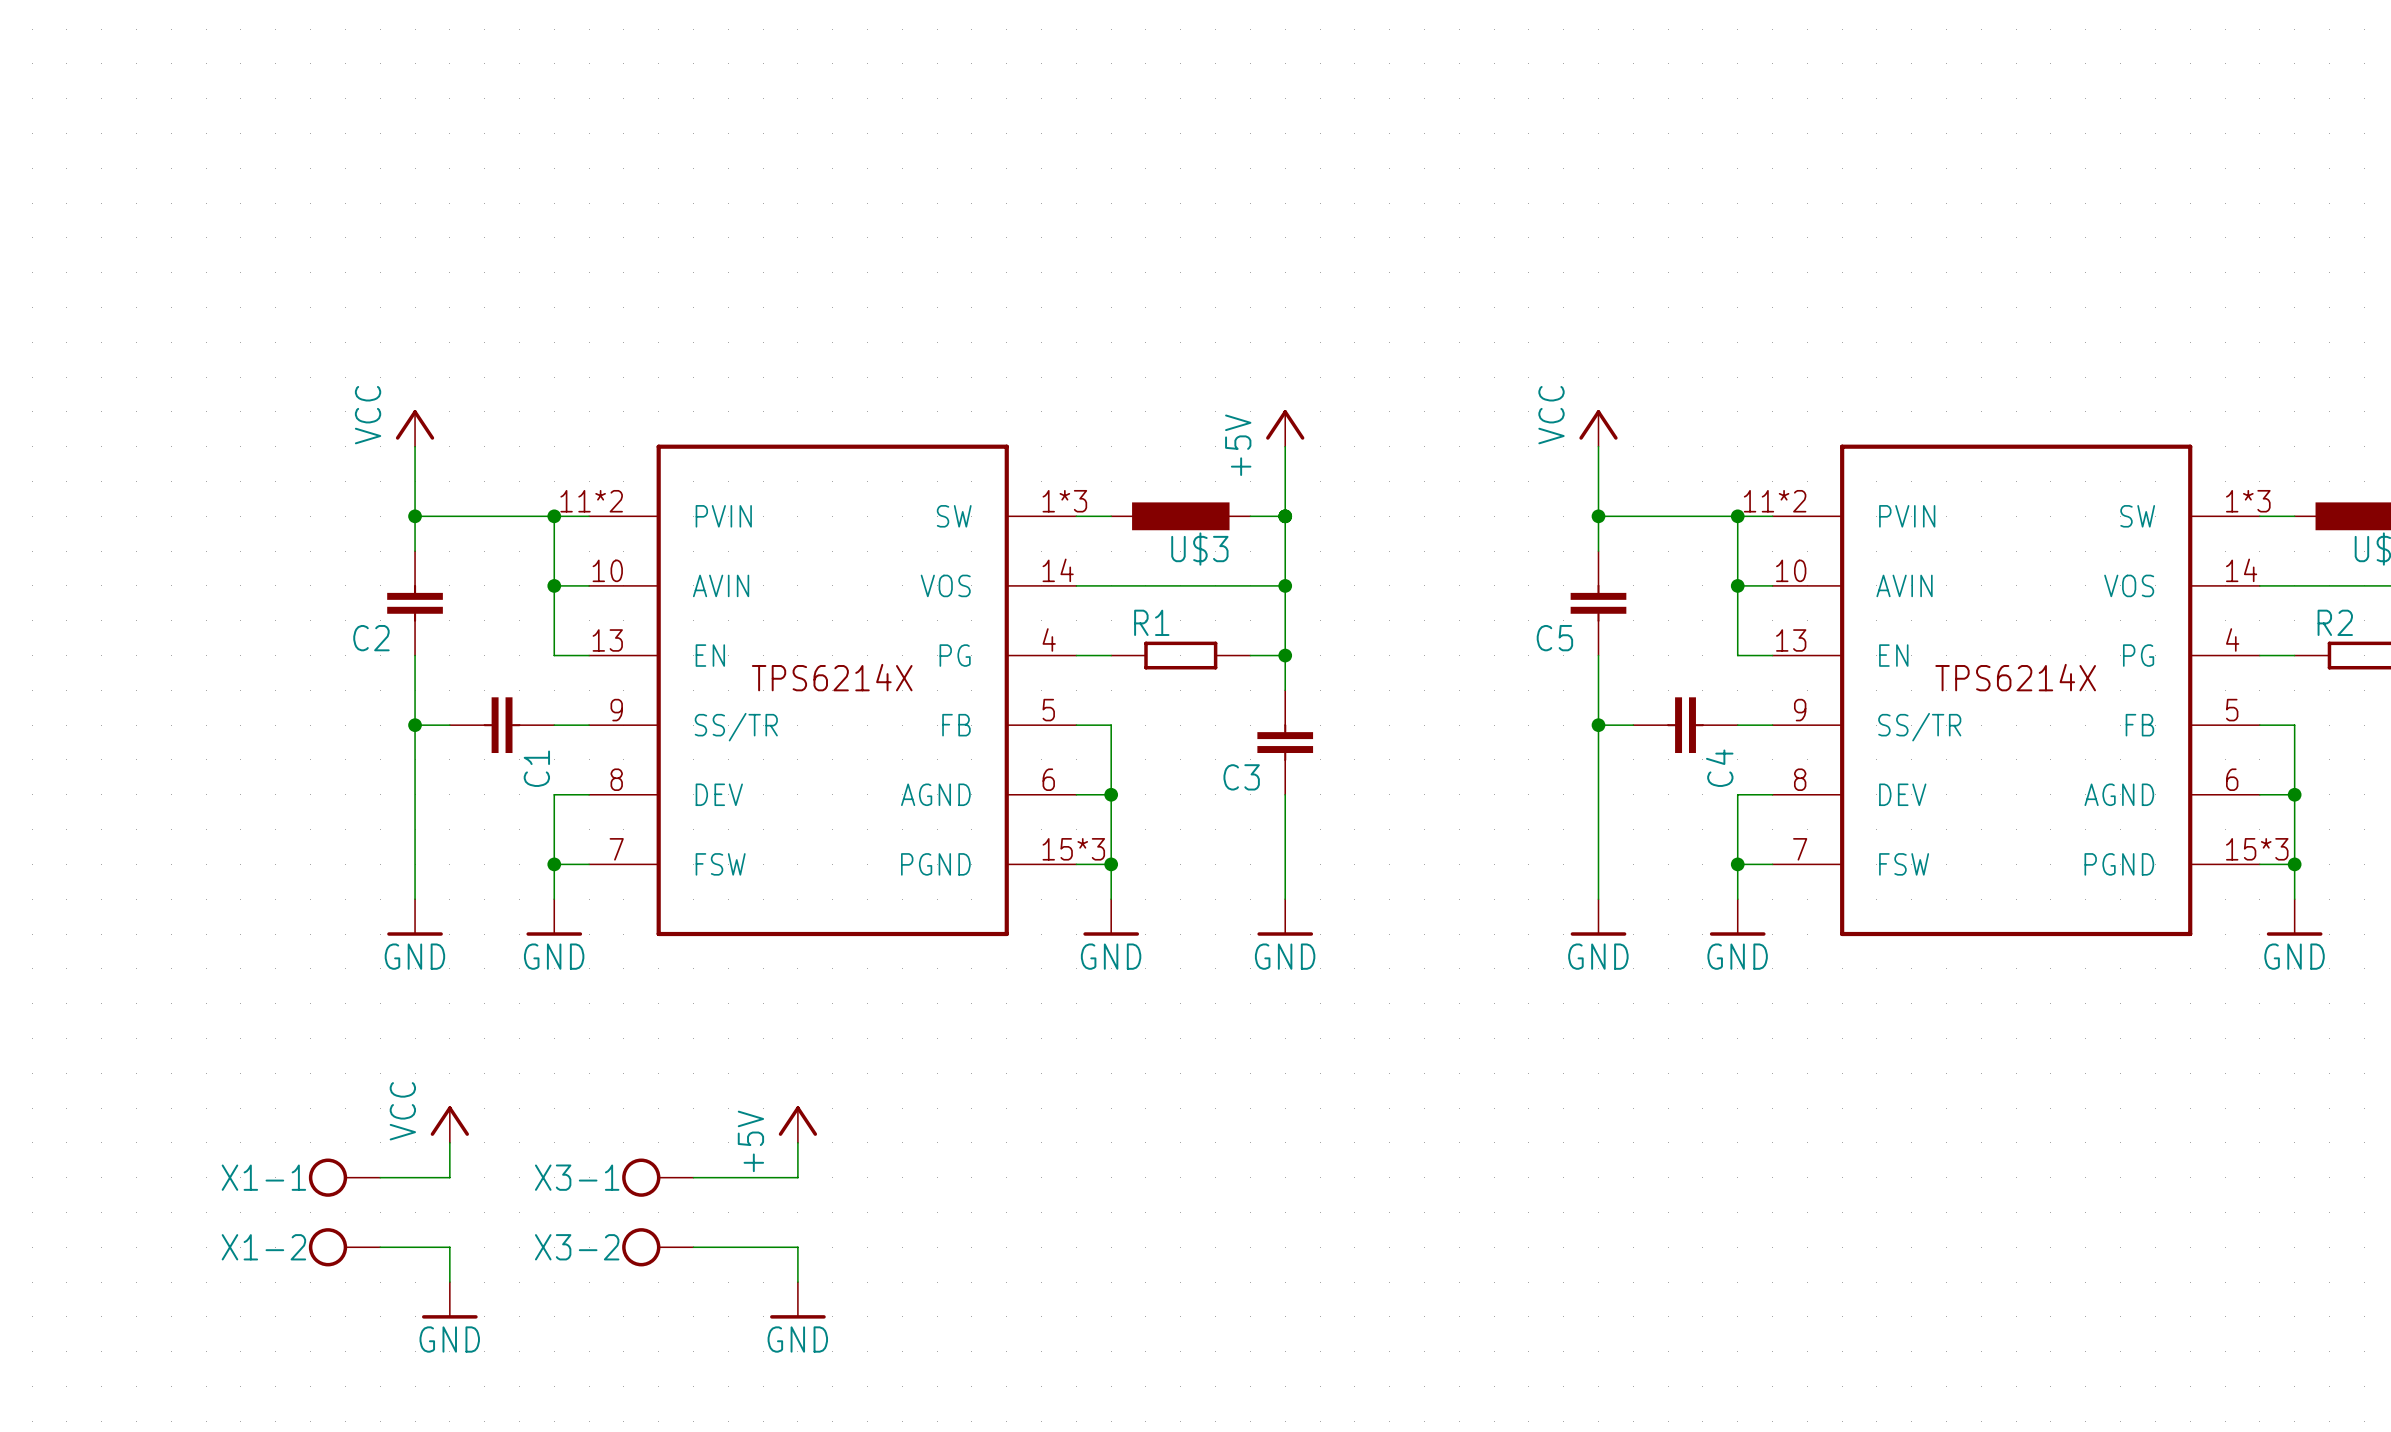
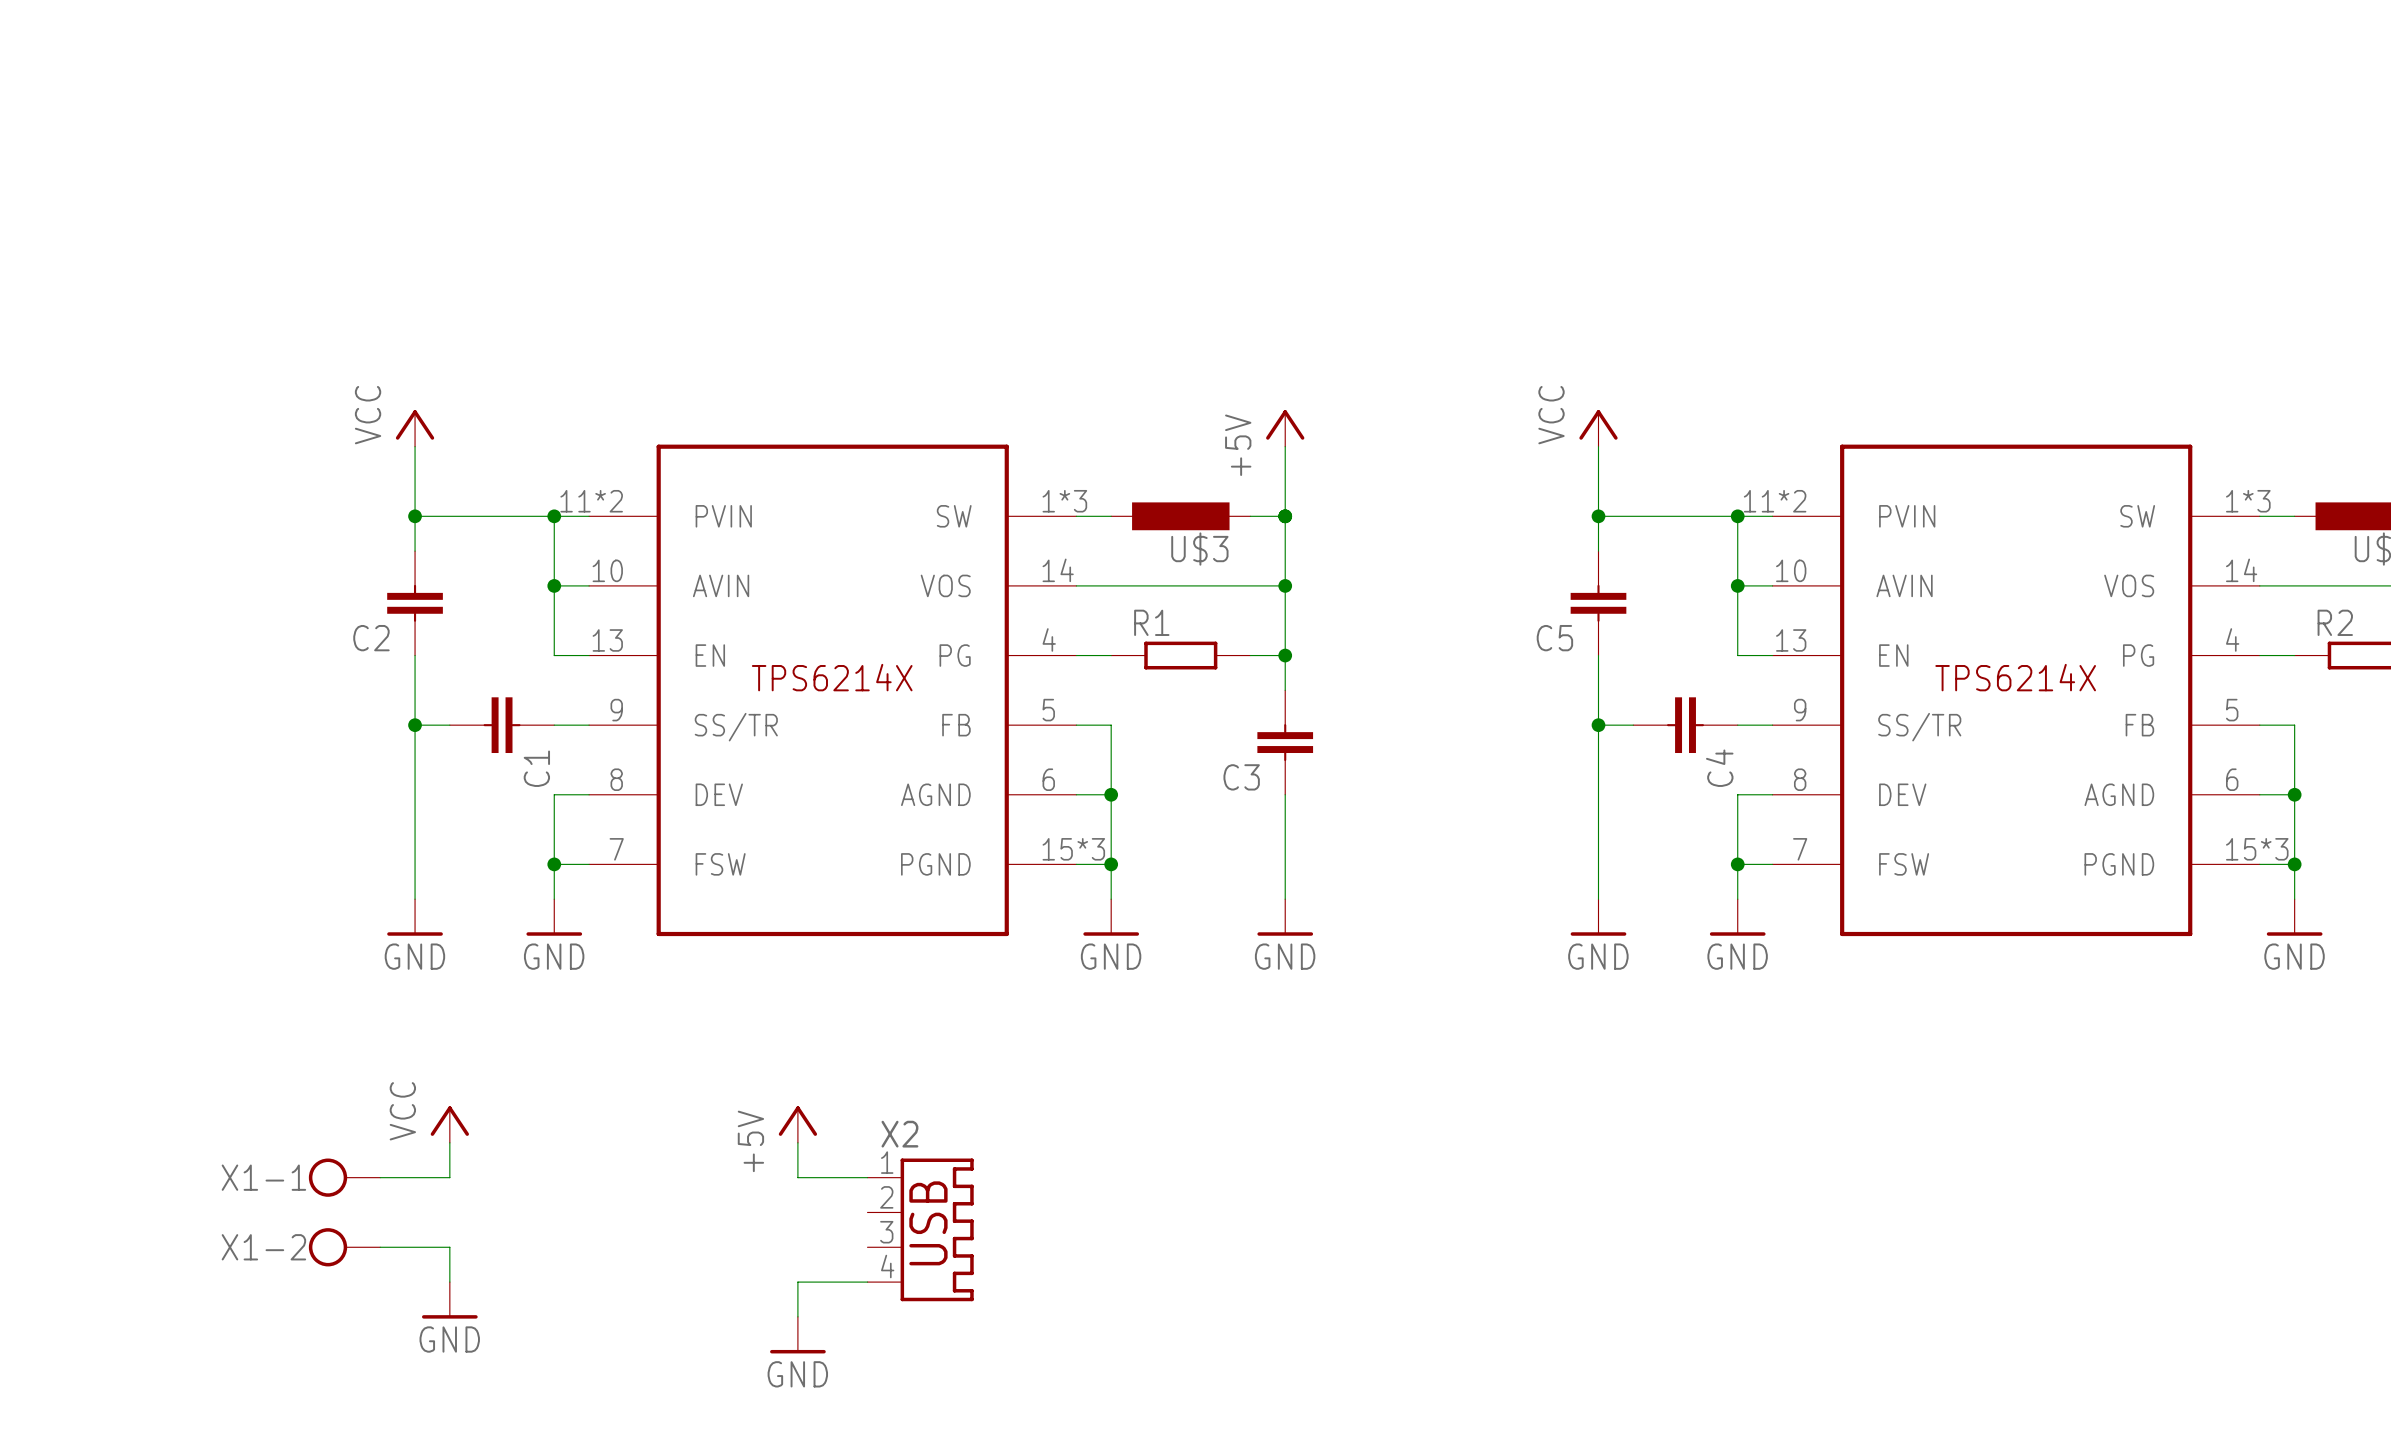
X3-1: (657, 1177) -> none
wire: (693, 1177) (797, 1177) -> (867, 1177) (797, 1177)
X2: none -> (920, 1229)
X3-2: (657, 1247) -> none
wire: (693, 1247) (797, 1247) (797, 1282) -> none
wire: none -> (867, 1282) (797, 1282) (797, 1316)
power symbol position: GND (797, 1300) -> GND (797, 1335)

